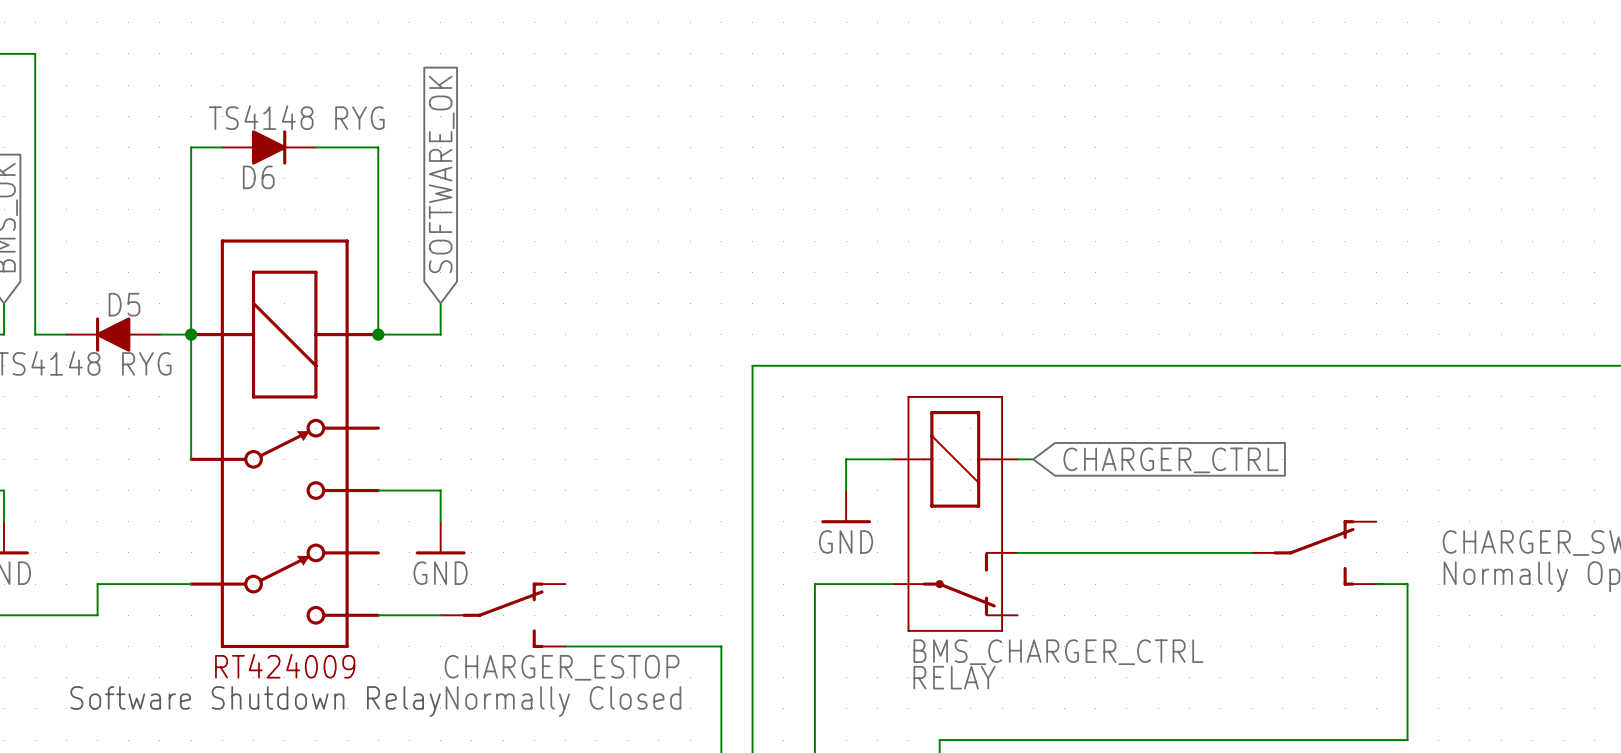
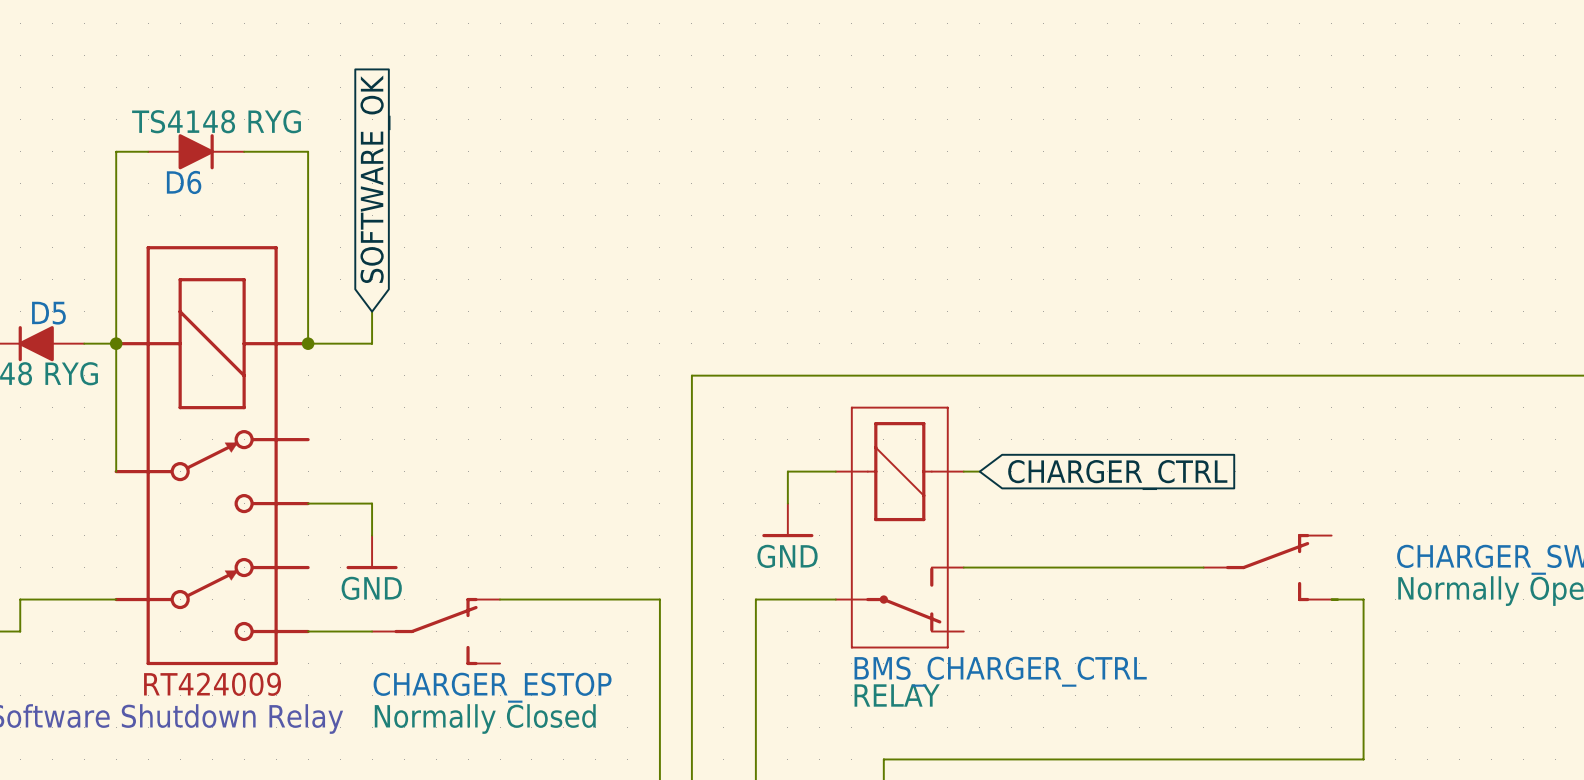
wire: (565, 646) (721, 646) -> (500, 599) (659, 599) (659, 663)

